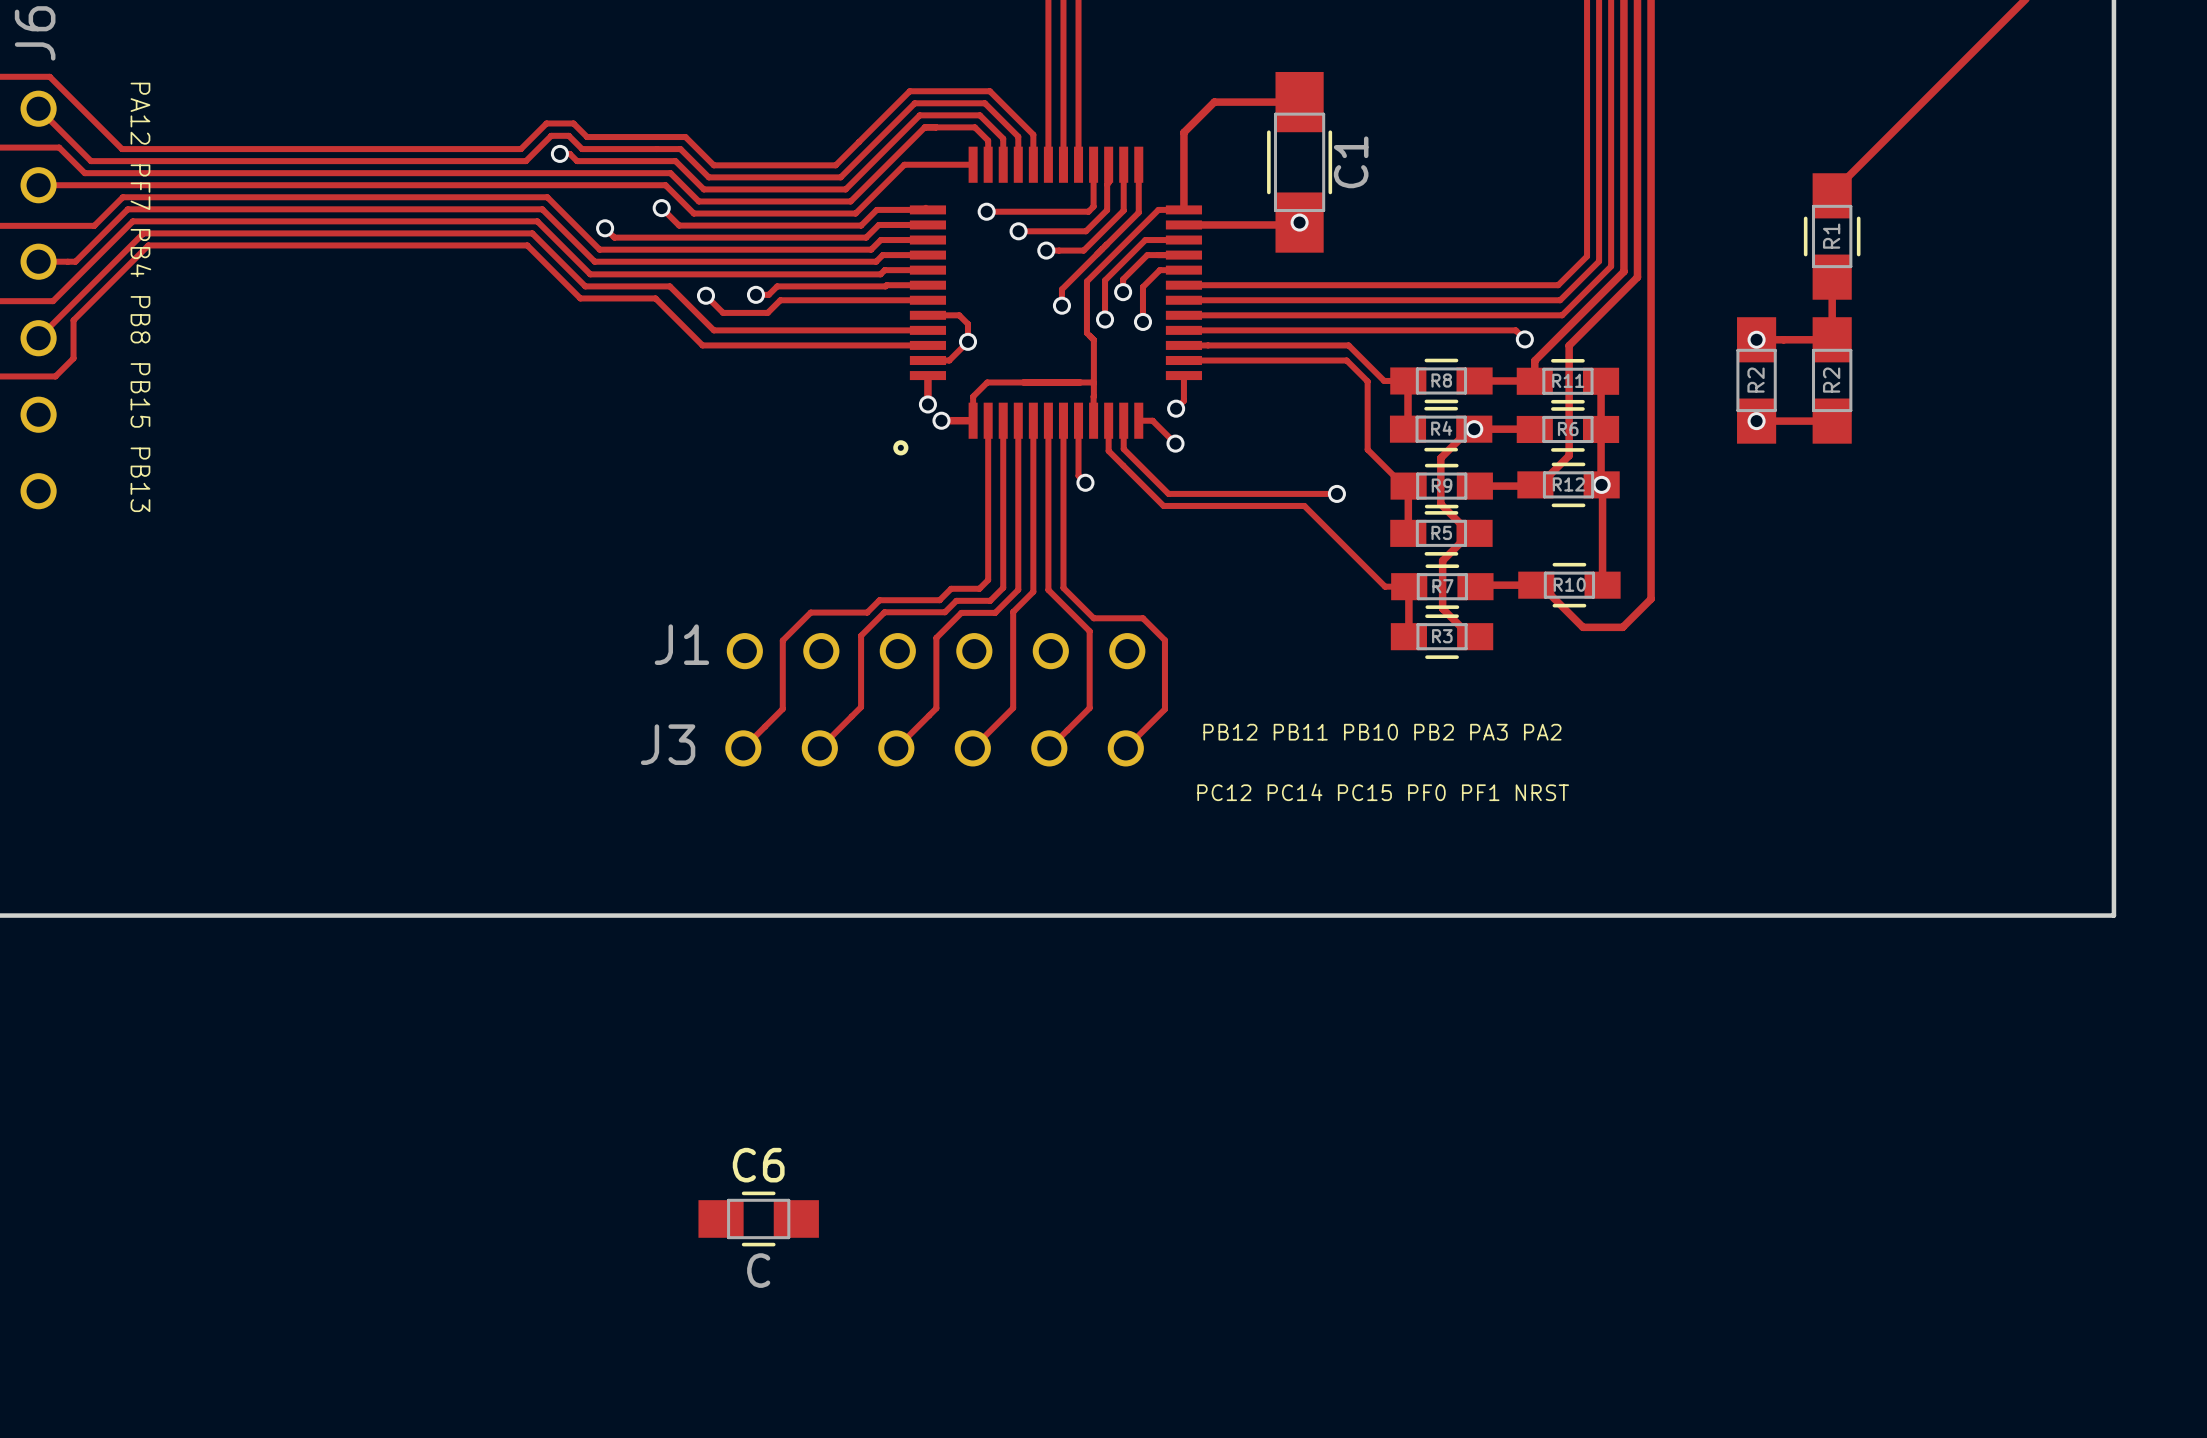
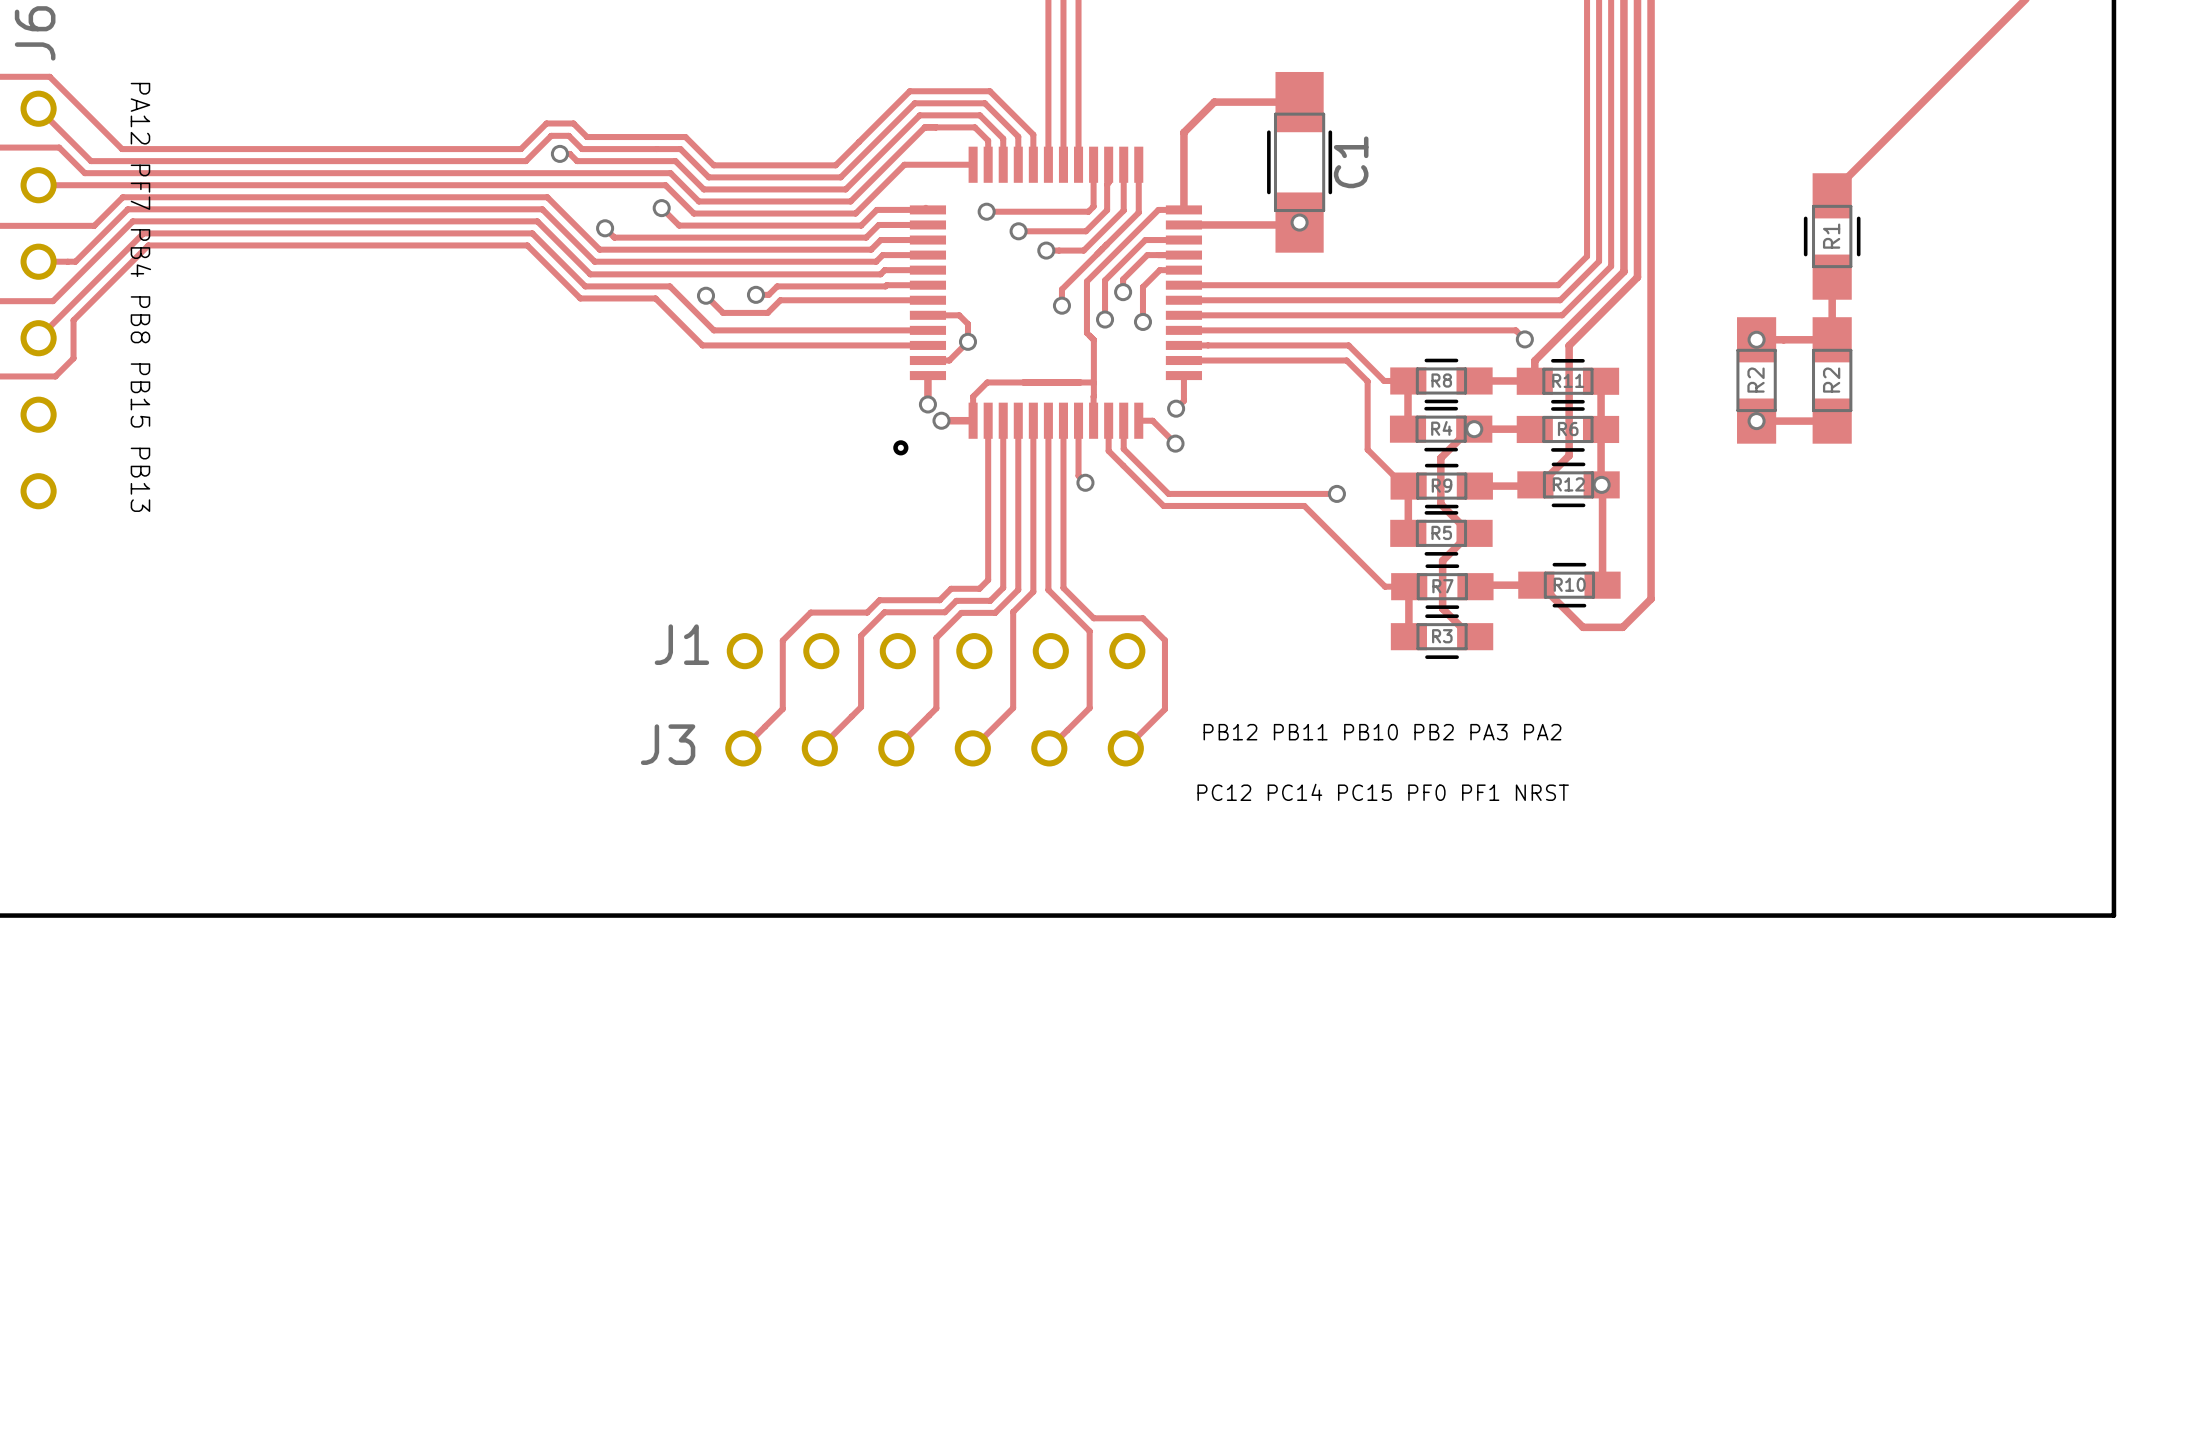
C6: C (758, 1218) -> none

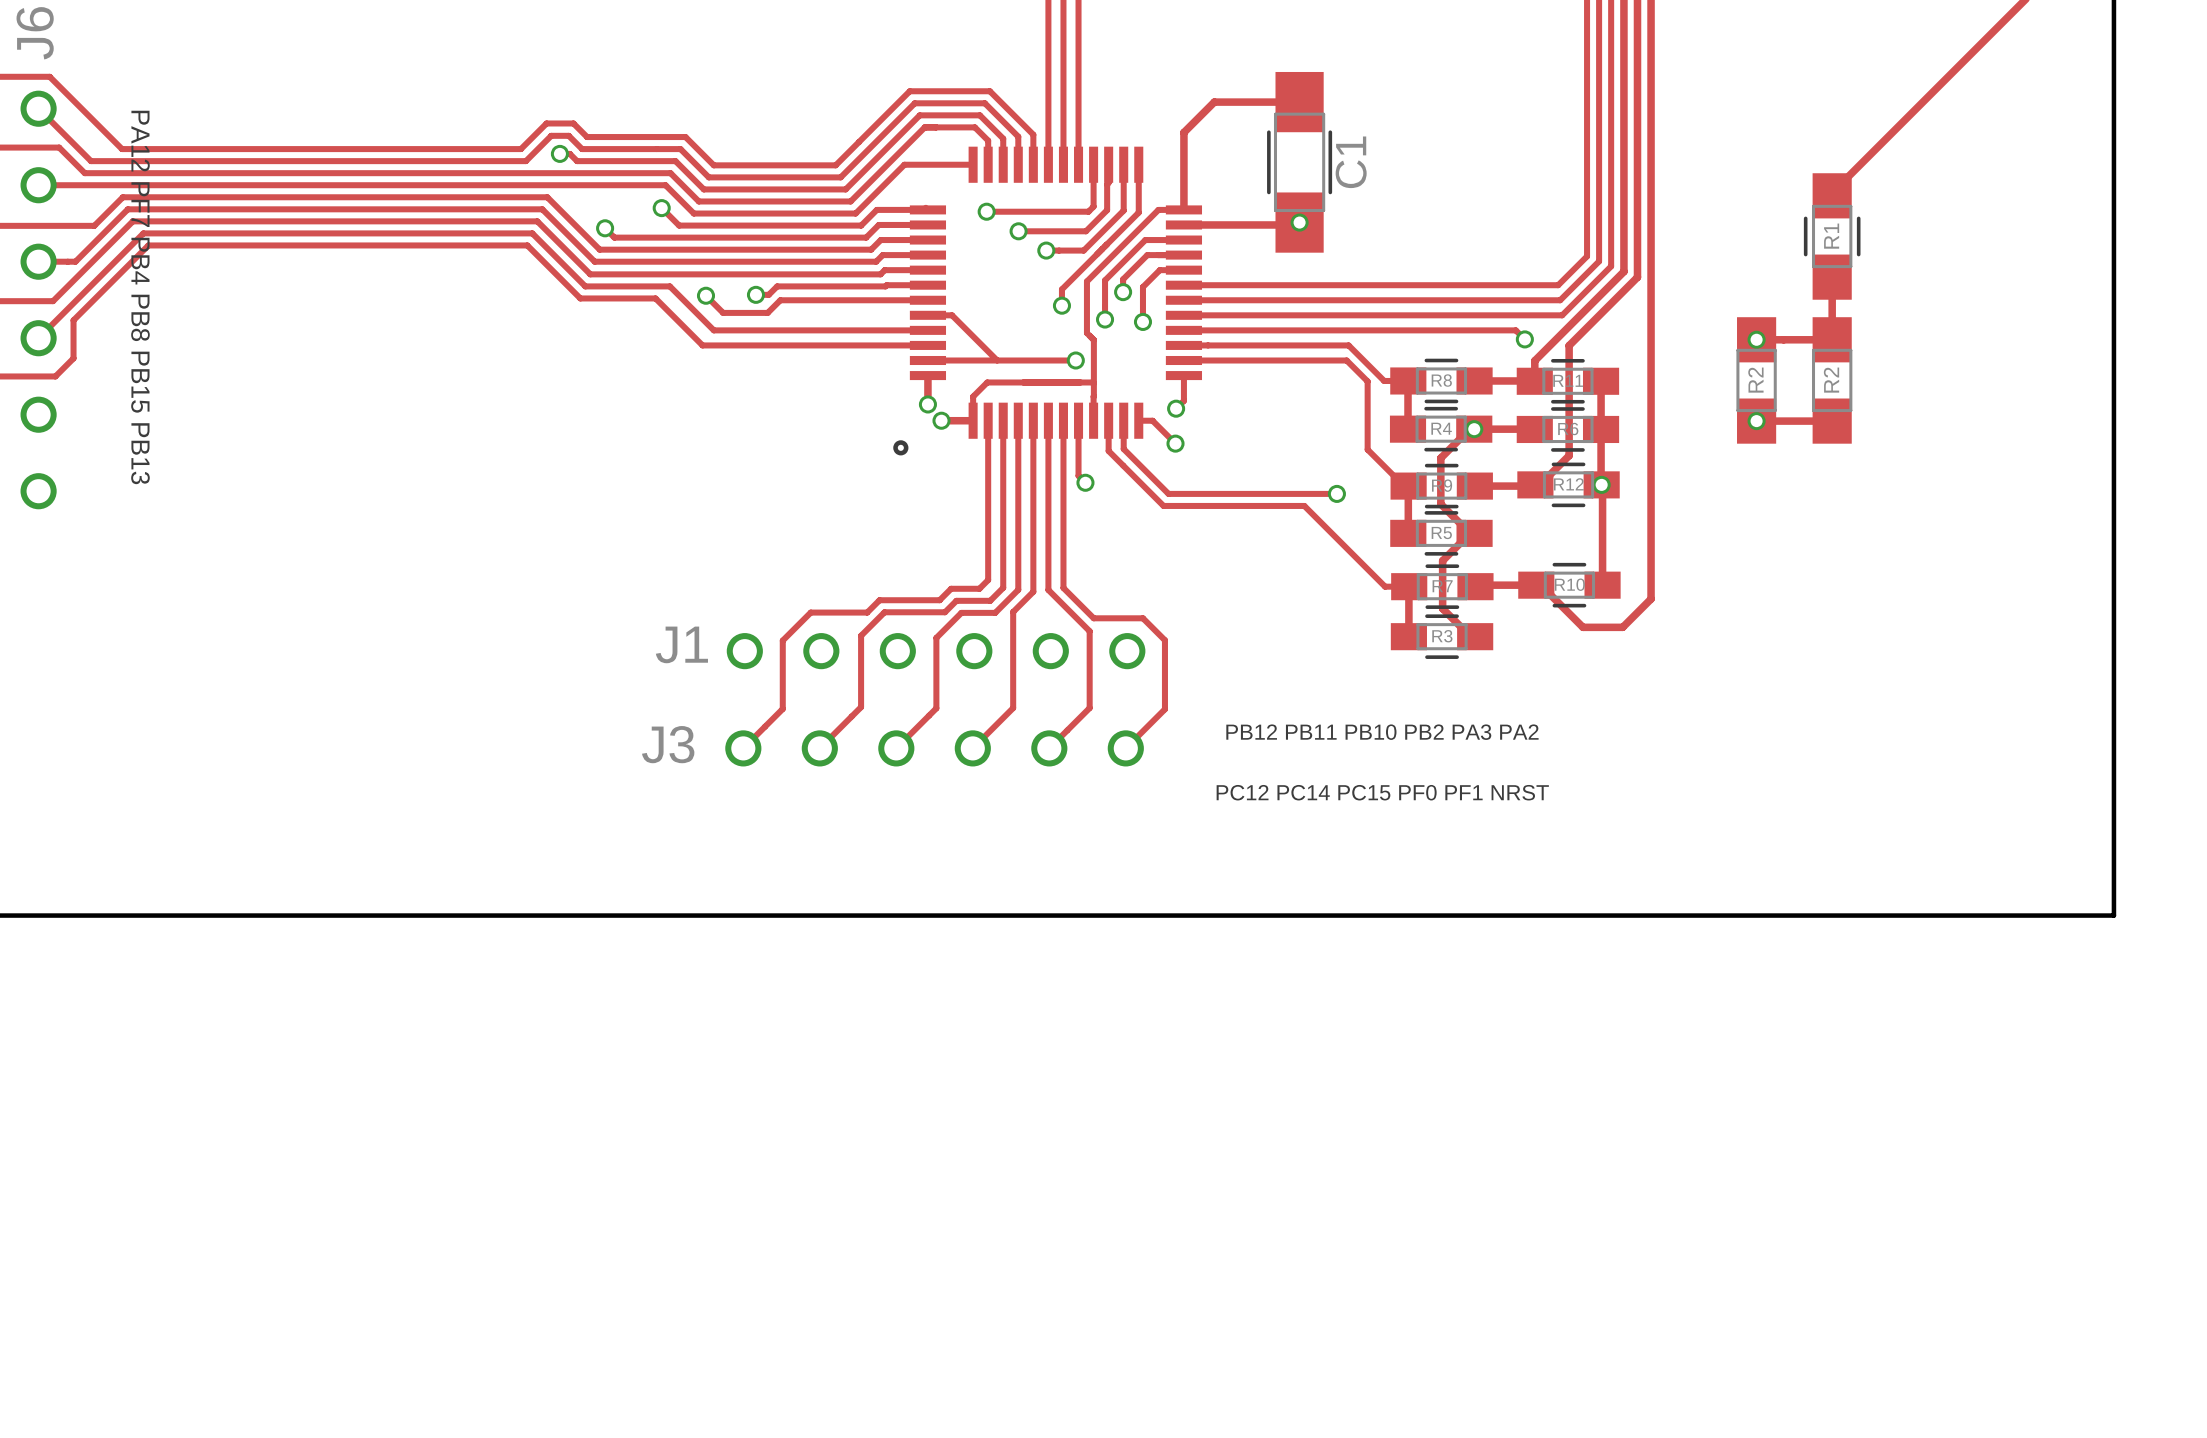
track: (952, 315) (959, 315) (968, 324) (968, 341) (949, 360) -> (952, 315) (997, 360)
via position: (968, 341) -> (1075, 360)
track: none -> (949, 360) (1075, 360)

